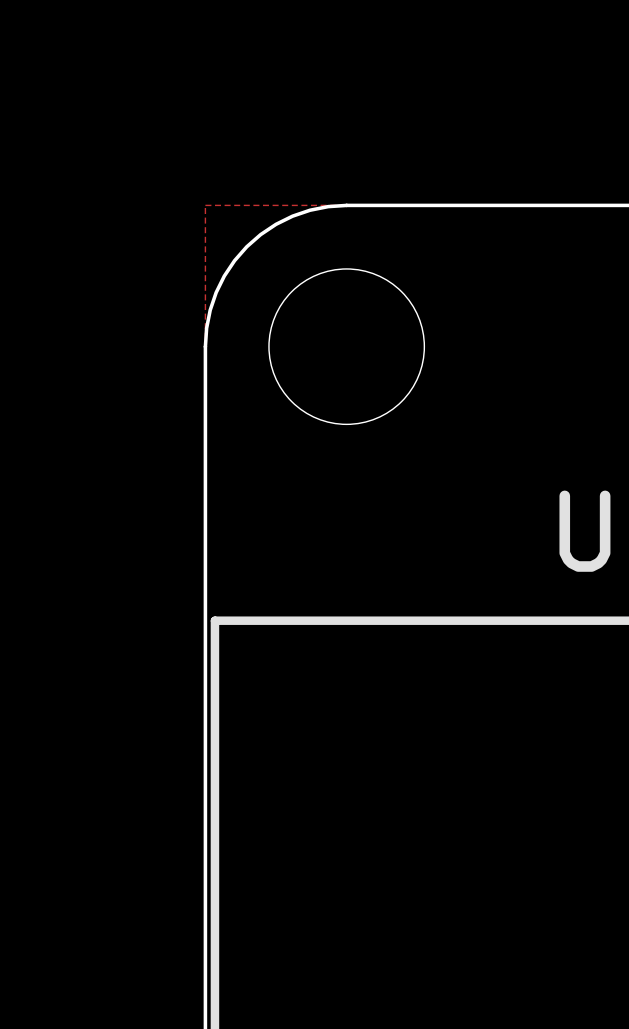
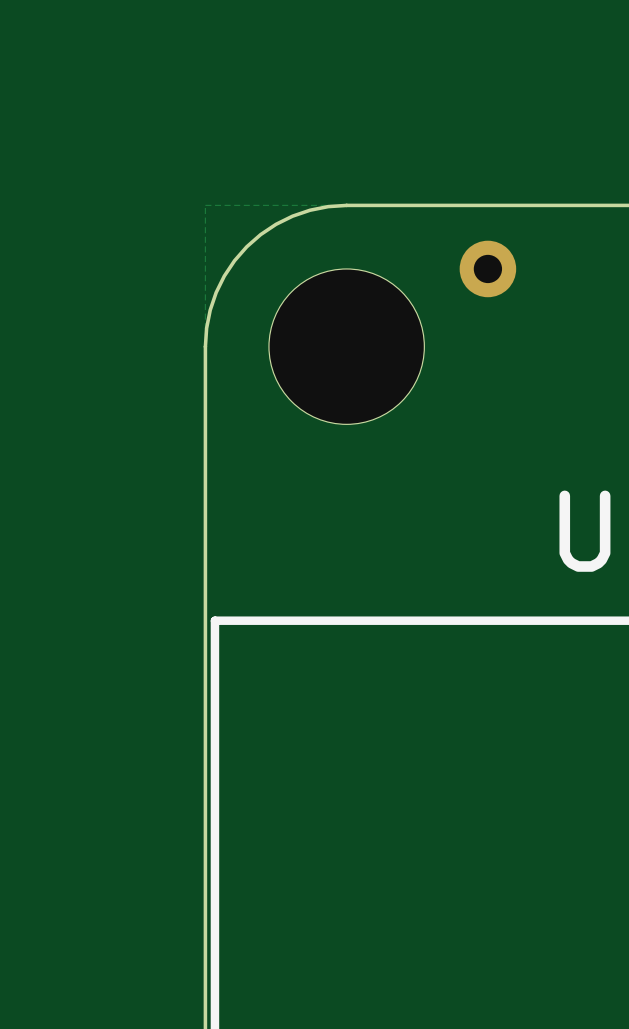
via: none -> (487, 268)

